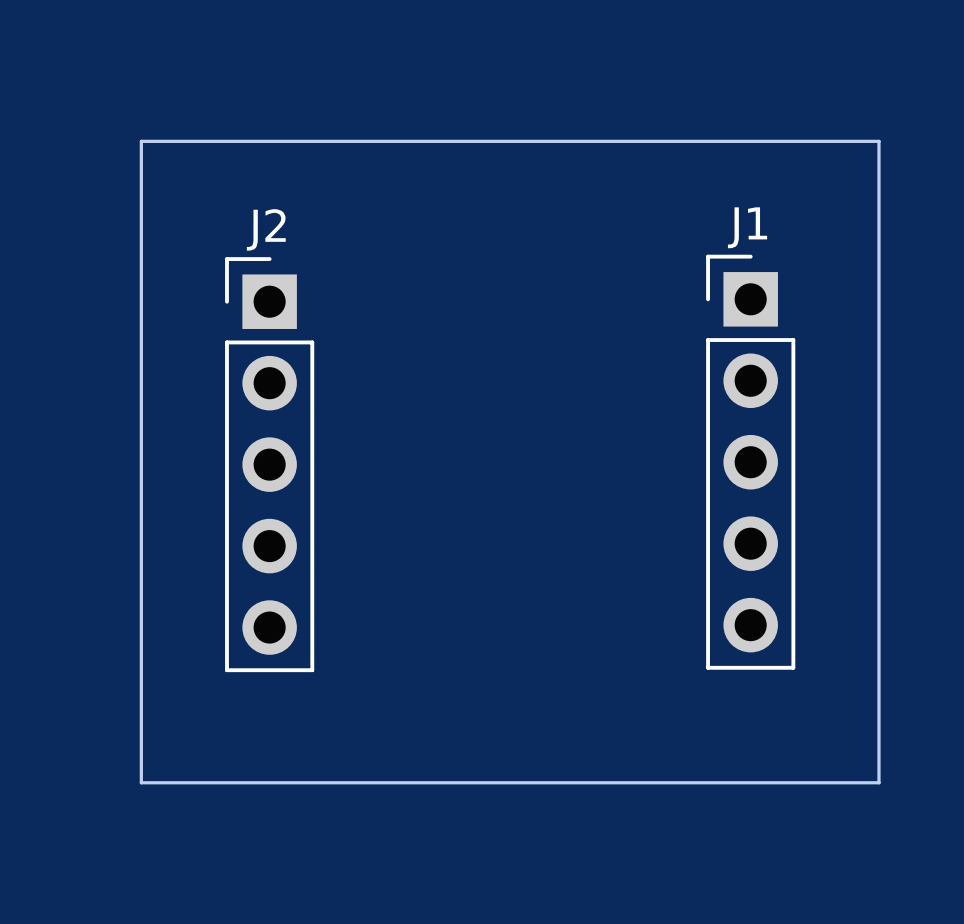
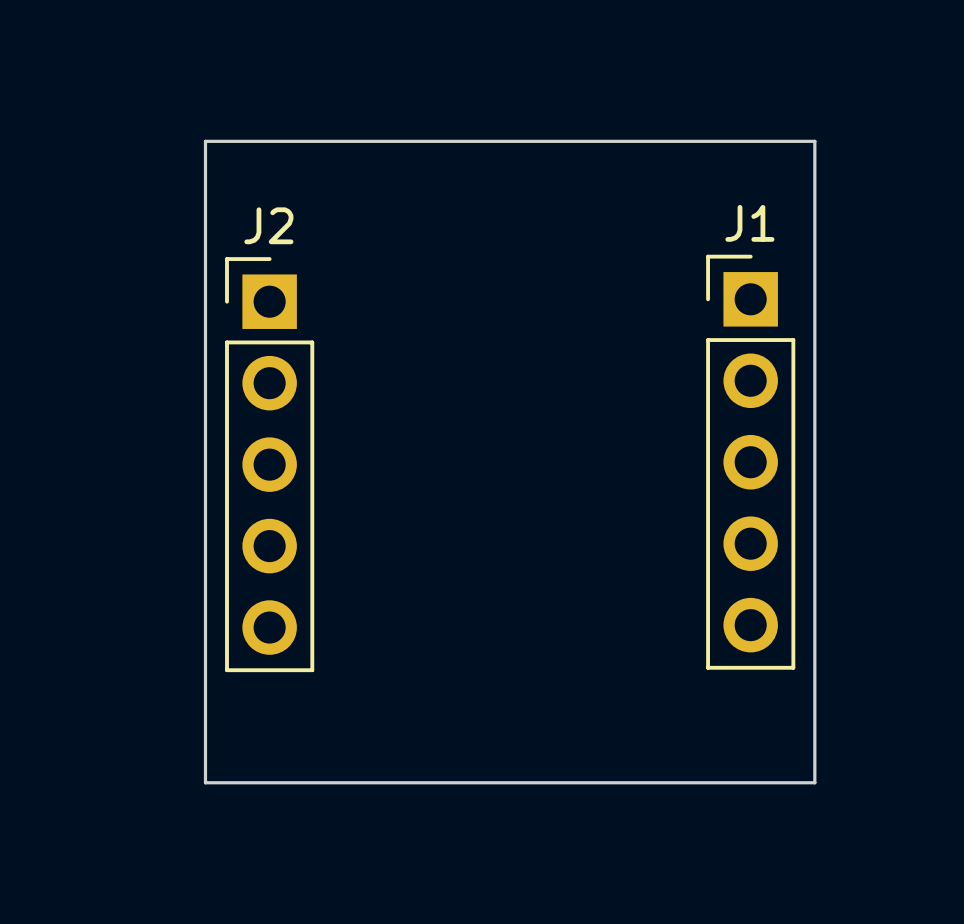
board edge: (205, 141) (141, 141) (141, 782) (205, 782) -> (205, 141) (205, 782)
board edge: (814, 141) (878, 141) (878, 782) (814, 782) -> (814, 141) (814, 782)

